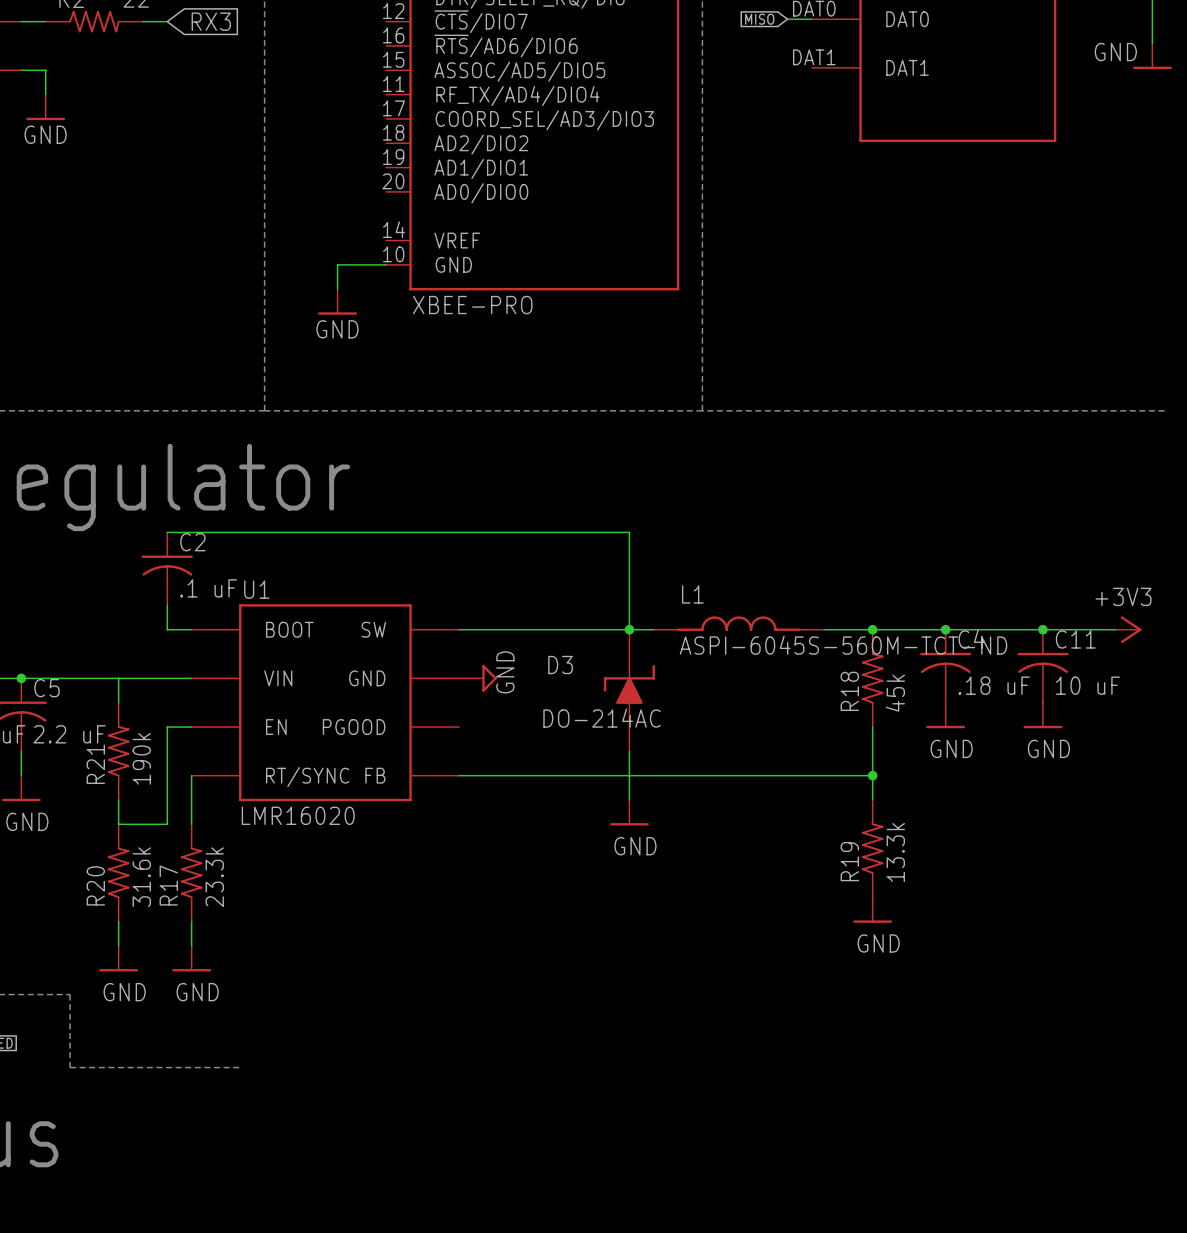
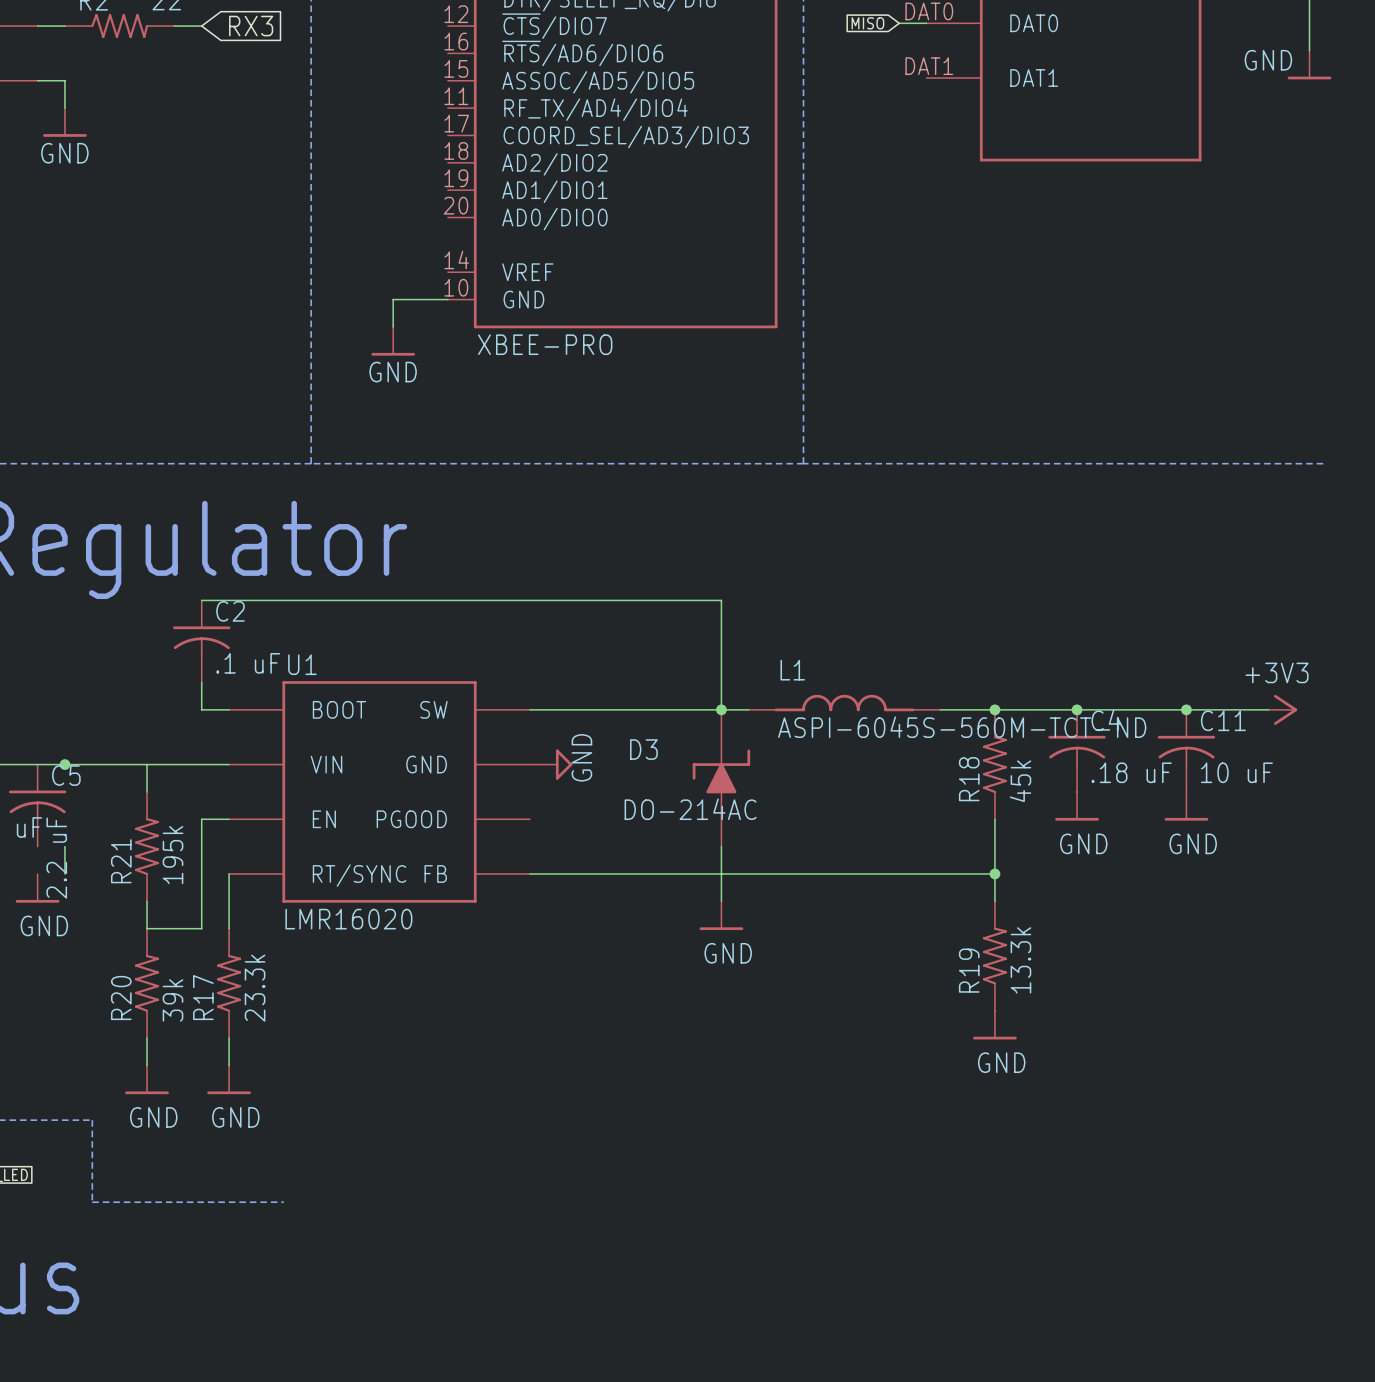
junction position: (21, 678) -> (64, 764)
C5 value rotation: 0° (69, 734) -> 90° counterclockwise (56, 858)
wire: (21, 751) (21, 775) -> (64, 846) (64, 873)
R21 value: 190k (141, 758) -> 195k (173, 855)
R20 value: 31.6k (141, 877) -> 39k (173, 1000)

